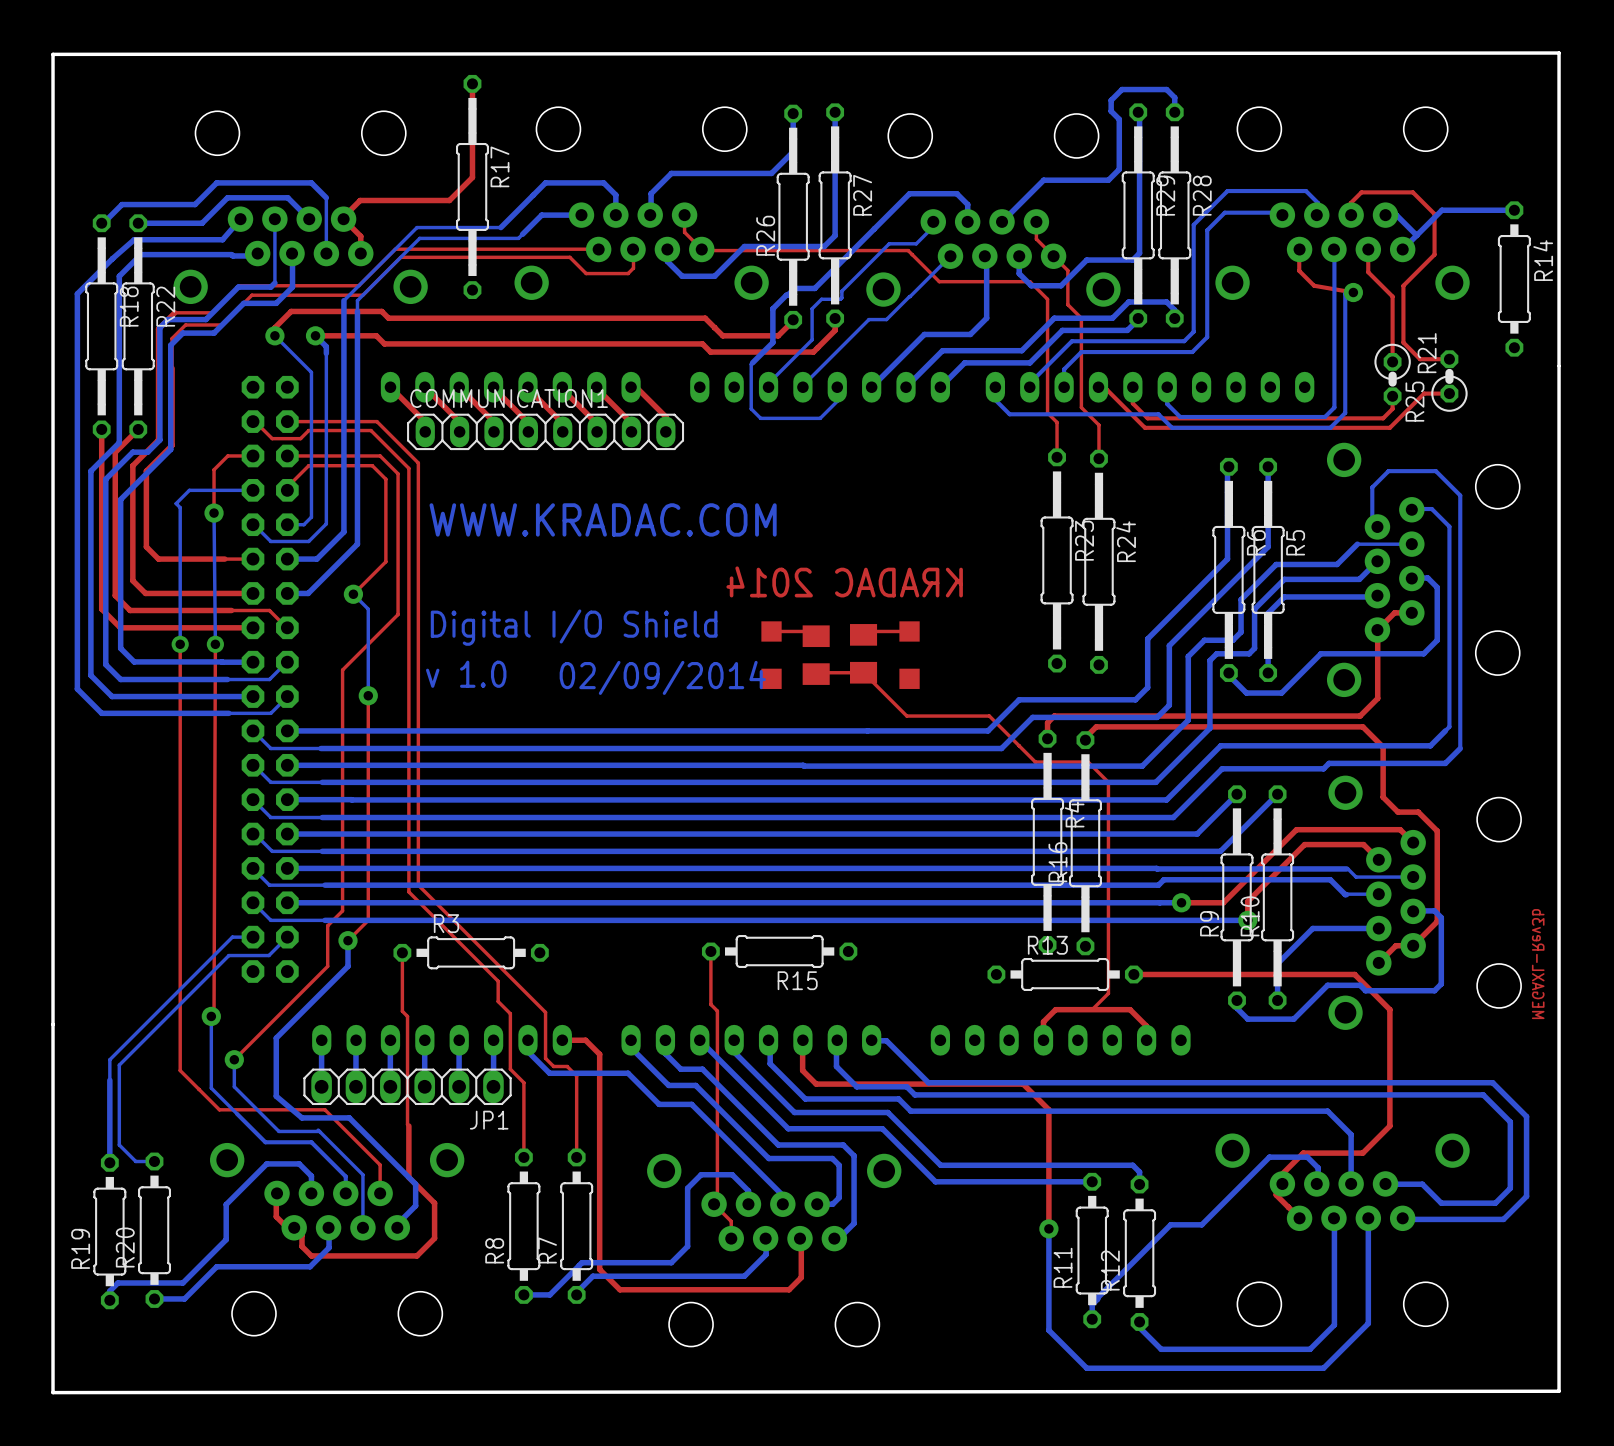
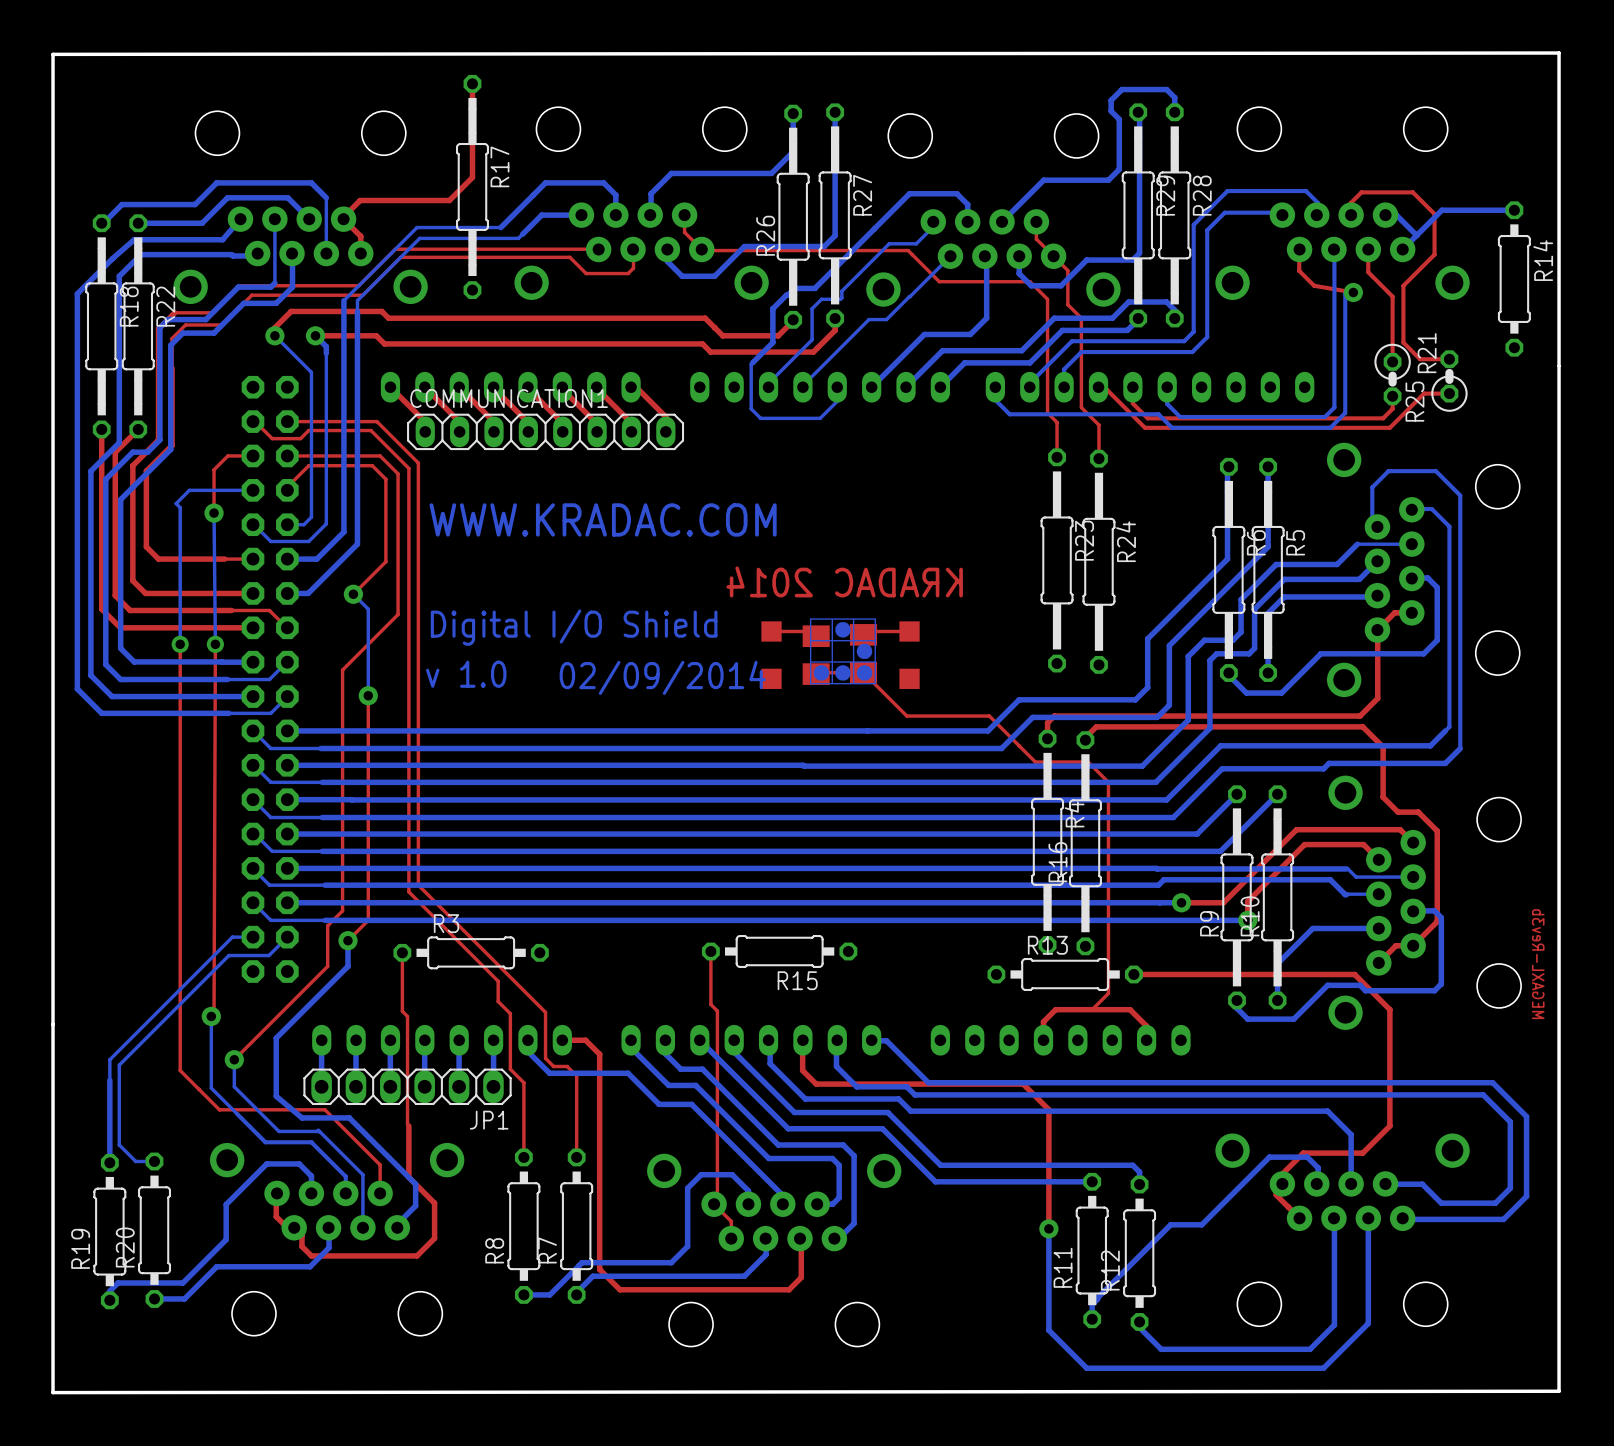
drawing: none -> [809, 618, 876, 685]

